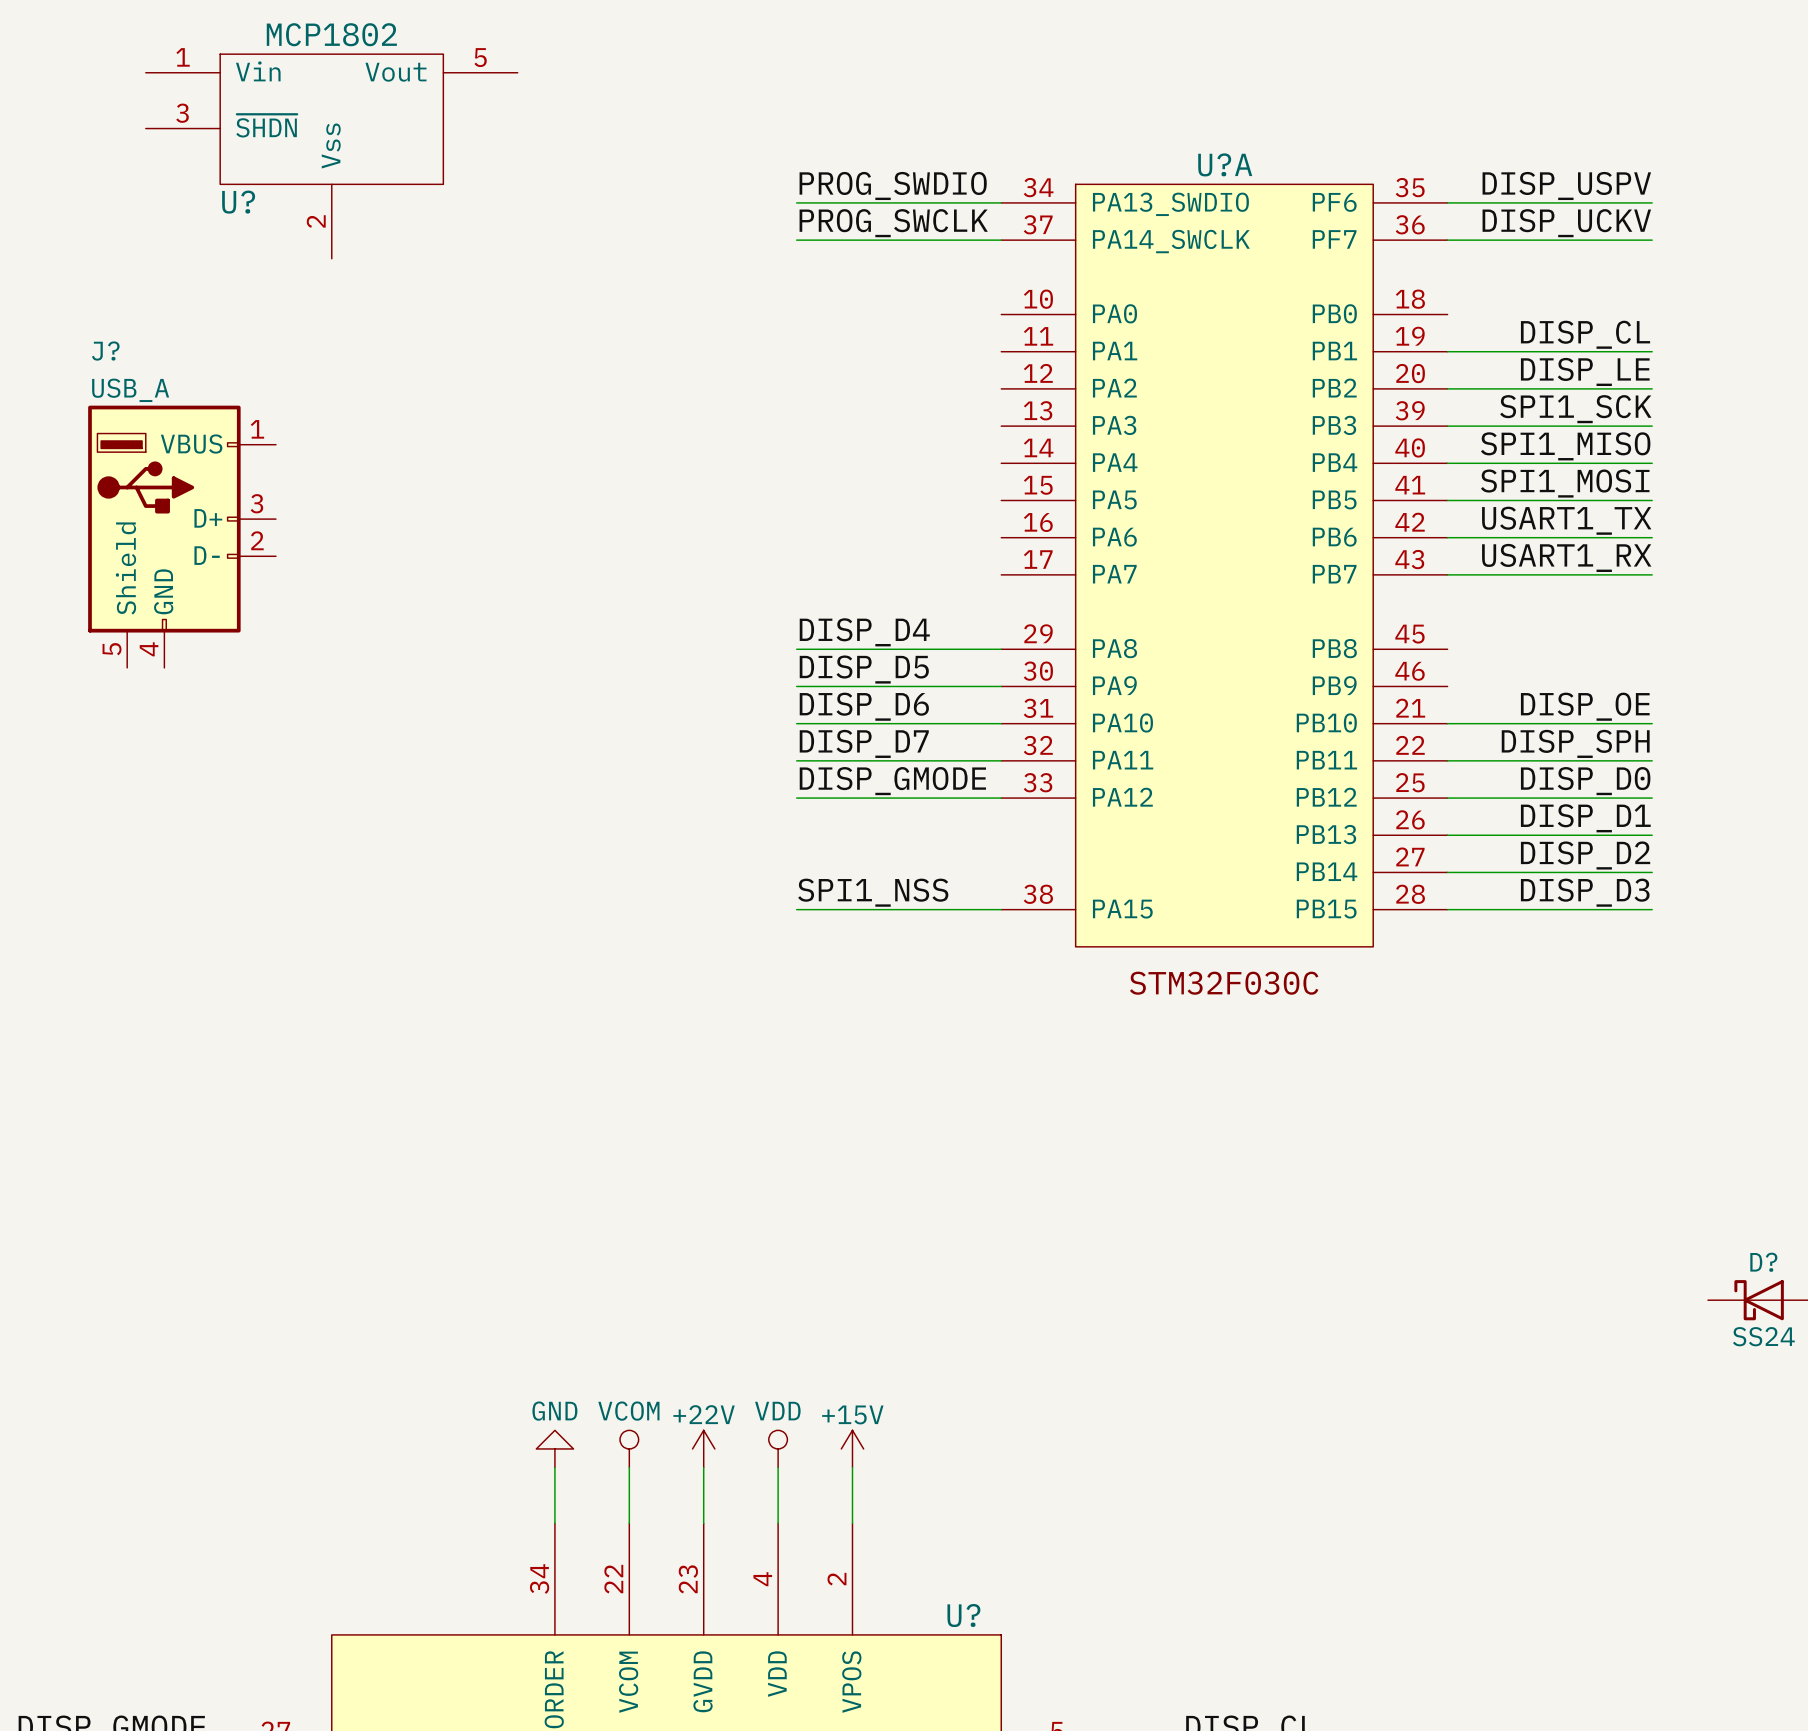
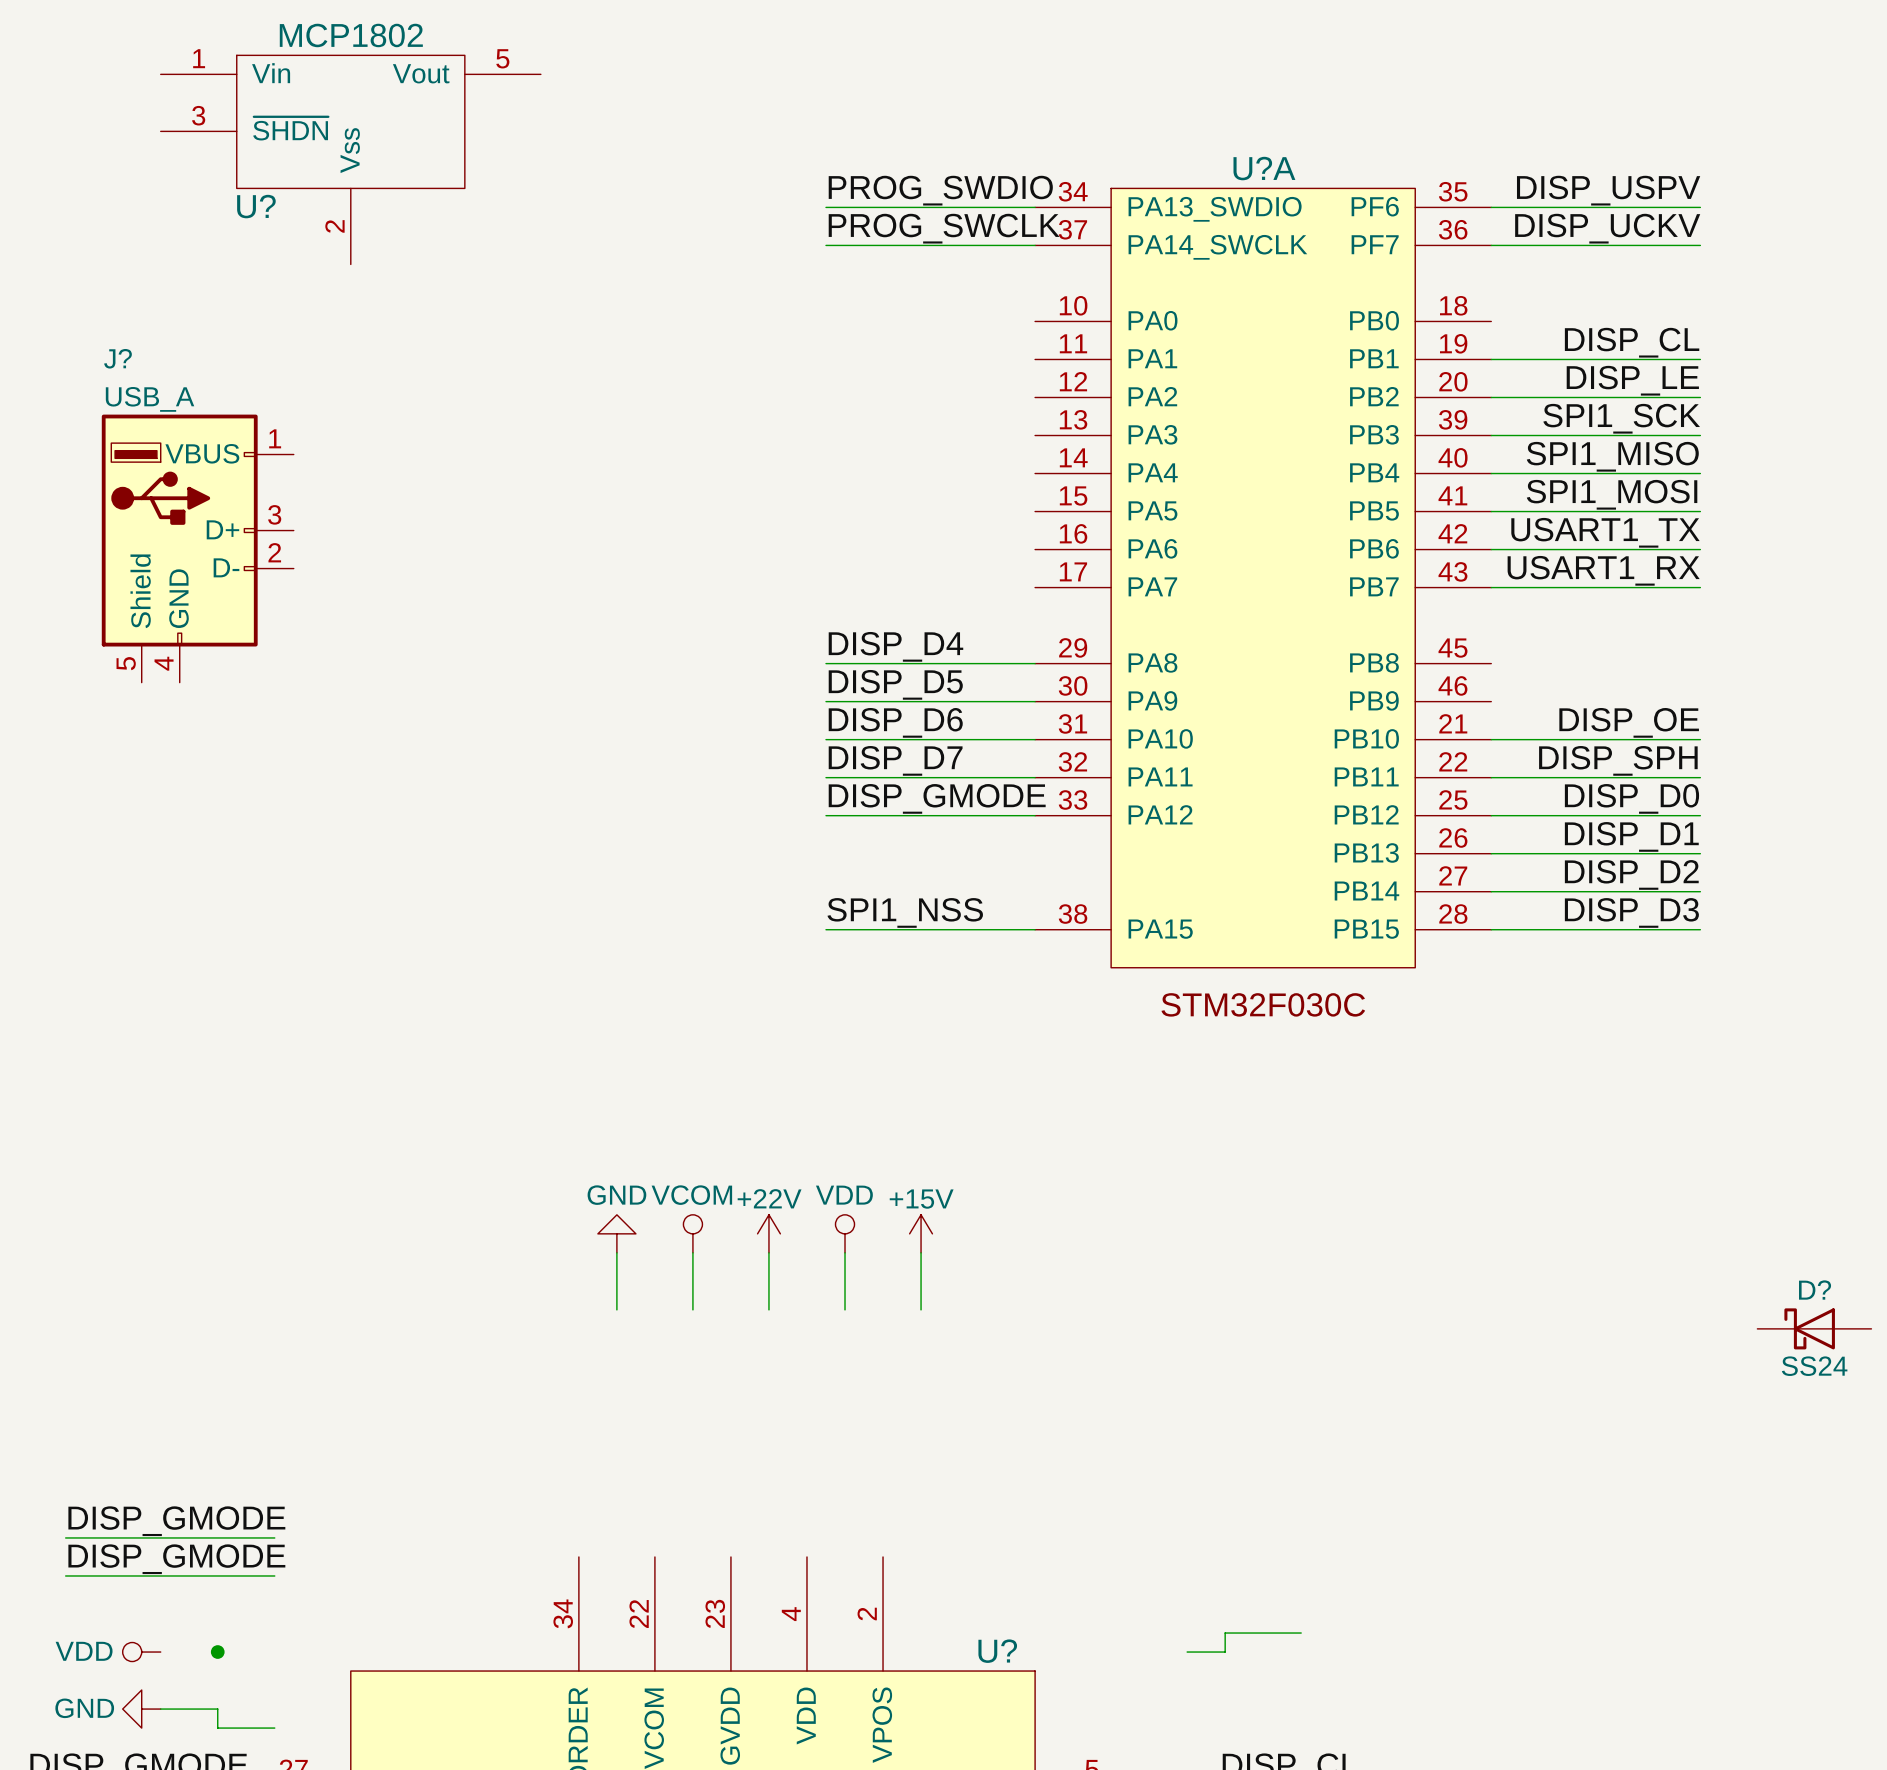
power symbol: none -> GND (616, 1233)
power symbol: GND (554, 1448) -> none
power symbol position: VCOM (629, 1448) -> VCOM (692, 1233)
power symbol position: +22V (703, 1448) -> +22V (768, 1233)
power symbol position: VDD (778, 1448) -> VDD (845, 1233)
power symbol position: +15V (852, 1448) -> +15V (921, 1233)
wire: (554, 1467) (554, 1523) -> (616, 1252) (616, 1309)
wire: (629, 1467) (629, 1523) -> (692, 1252) (692, 1309)
wire: (703, 1467) (703, 1523) -> (768, 1252) (768, 1309)
wire: (778, 1467) (778, 1523) -> (845, 1252) (845, 1309)
wire: (852, 1467) (852, 1523) -> (921, 1252) (921, 1309)
label: none -> DISP_GMODE (176, 1521)
wire: none -> (65, 1537) (274, 1537)
label: none -> DISP_GMODE (176, 1559)
wire: none -> (65, 1575) (274, 1575)
wire: none -> (1301, 1633) (1225, 1633) (1225, 1652) (1187, 1652)
power symbol: none -> VDD (141, 1652)
junction: none -> (217, 1652)
power symbol: none -> GND (141, 1709)
wire: none -> (160, 1709) (217, 1709) (217, 1728) (274, 1728)

